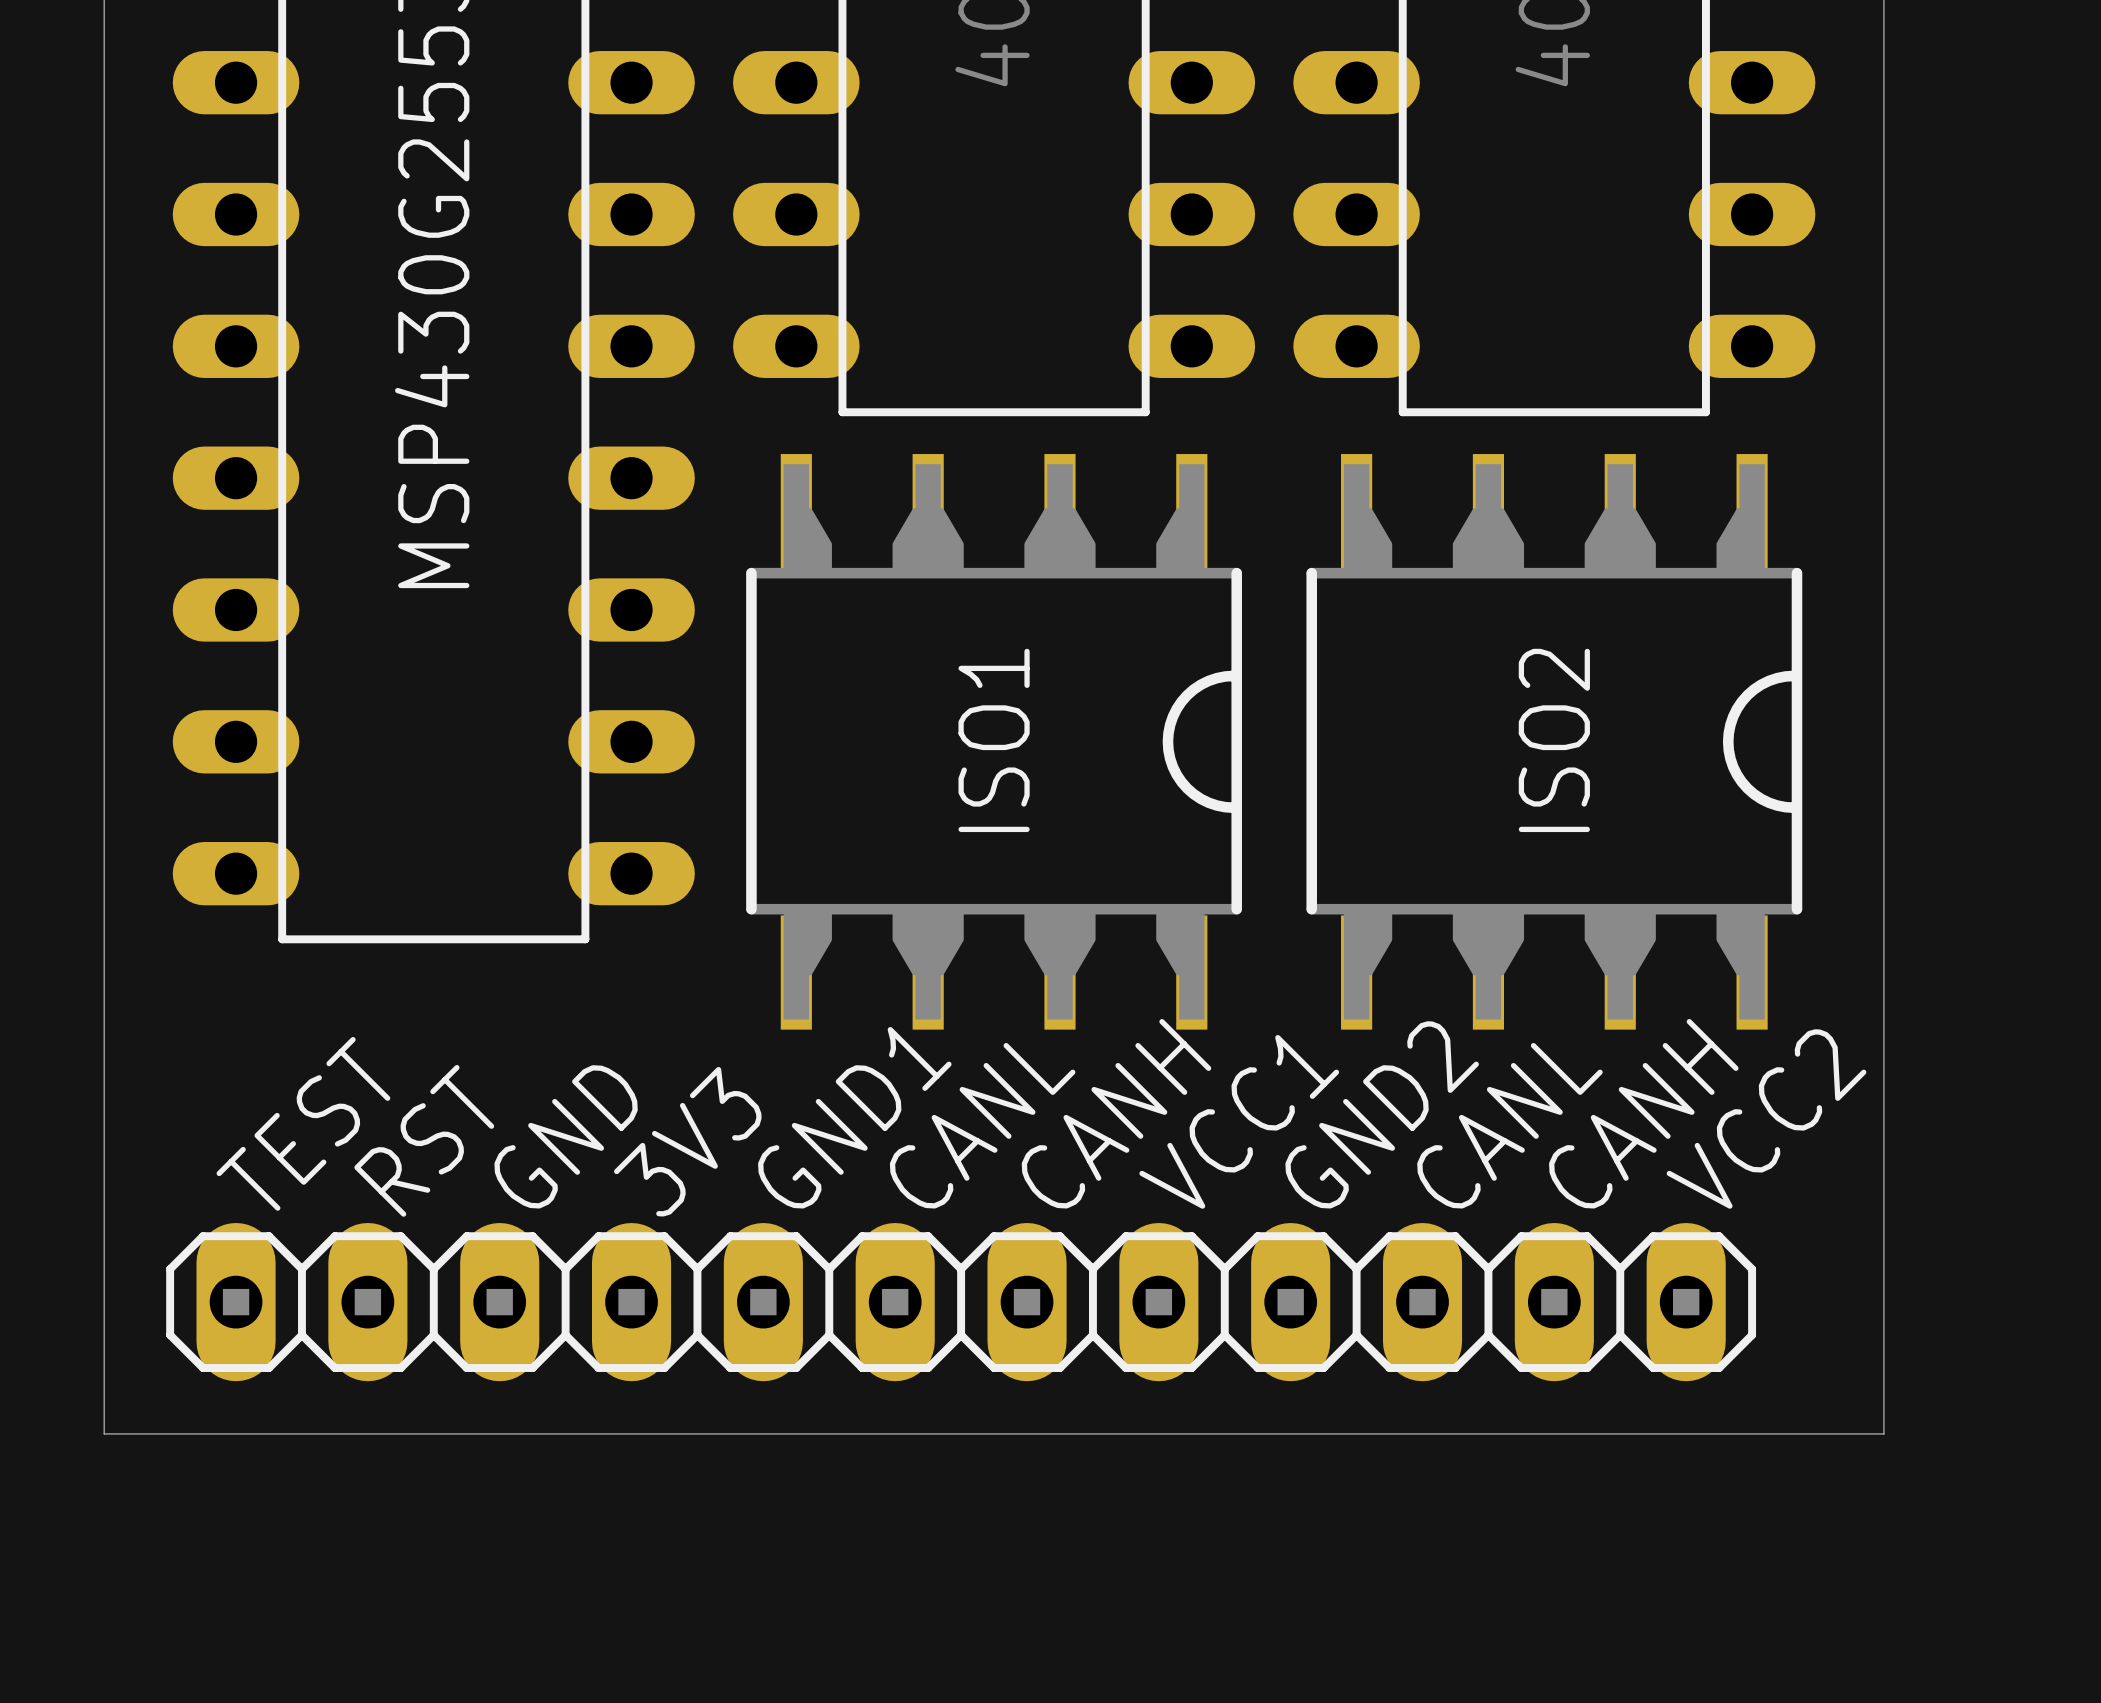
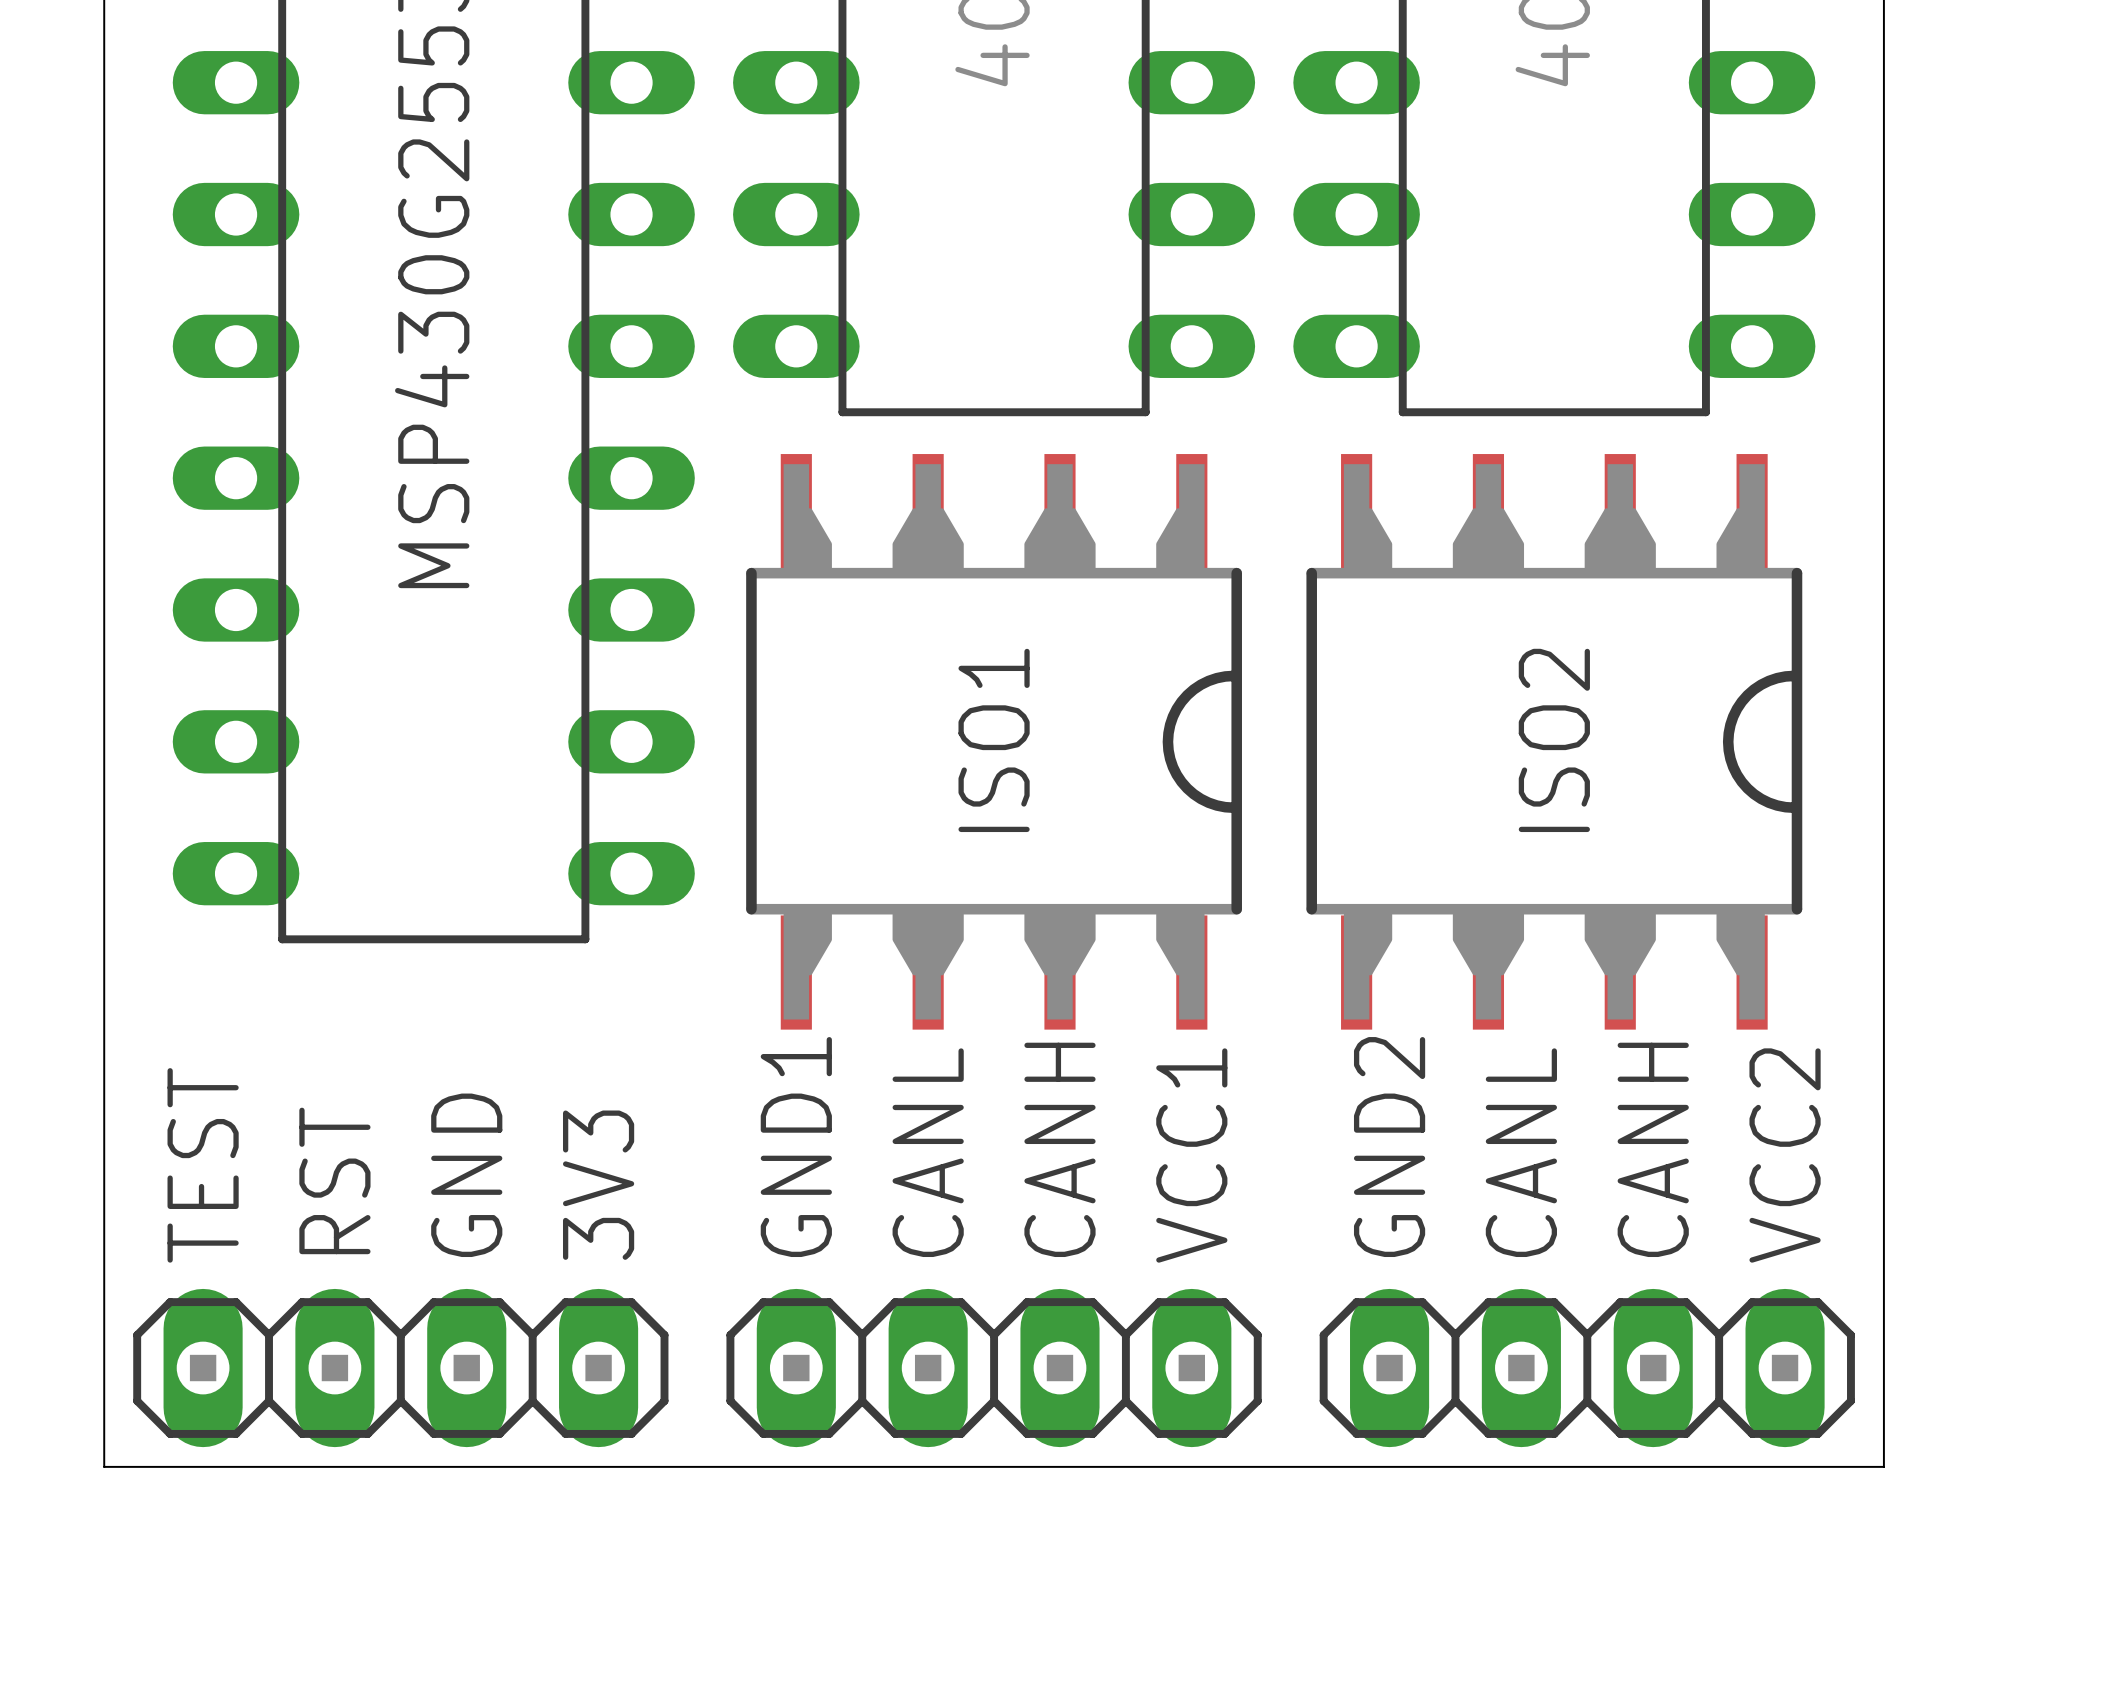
text rotation: 0° (1116, 1113) -> 45° counterclockwise (1059, 1149)
text rotation: 0° (1643, 1113) -> 45° counterclockwise (1653, 1149)
text rotation: 0° (1382, 1114) -> 45° counterclockwise (1389, 1147)
text rotation: 0° (854, 1117) -> 45° counterclockwise (796, 1147)
text rotation: 0° (1766, 1118) -> 45° counterclockwise (1785, 1155)
text rotation: 0° (1239, 1121) -> 45° counterclockwise (1191, 1155)
text rotation: 0° (303, 1123) -> 45° counterclockwise (203, 1165)
text rotation: 0° (982, 1125) -> 45° counterclockwise (928, 1152)
text rotation: 0° (1509, 1125) -> 45° counterclockwise (1521, 1152)
text rotation: 0° (566, 1136) -> 45° counterclockwise (466, 1175)
text rotation: 0° (424, 1140) -> 45° counterclockwise (334, 1180)
text rotation: 0° (687, 1141) -> 45° counterclockwise (598, 1185)
part: (961, 1302) -> none
part: none -> (400, 1368)
part: none -> (994, 1368)
part: none -> (1587, 1368)
board edge: (104, 1433) (1883, 1433) -> (104, 1433) (104, 1466) (1883, 1466) (1883, 1433)

